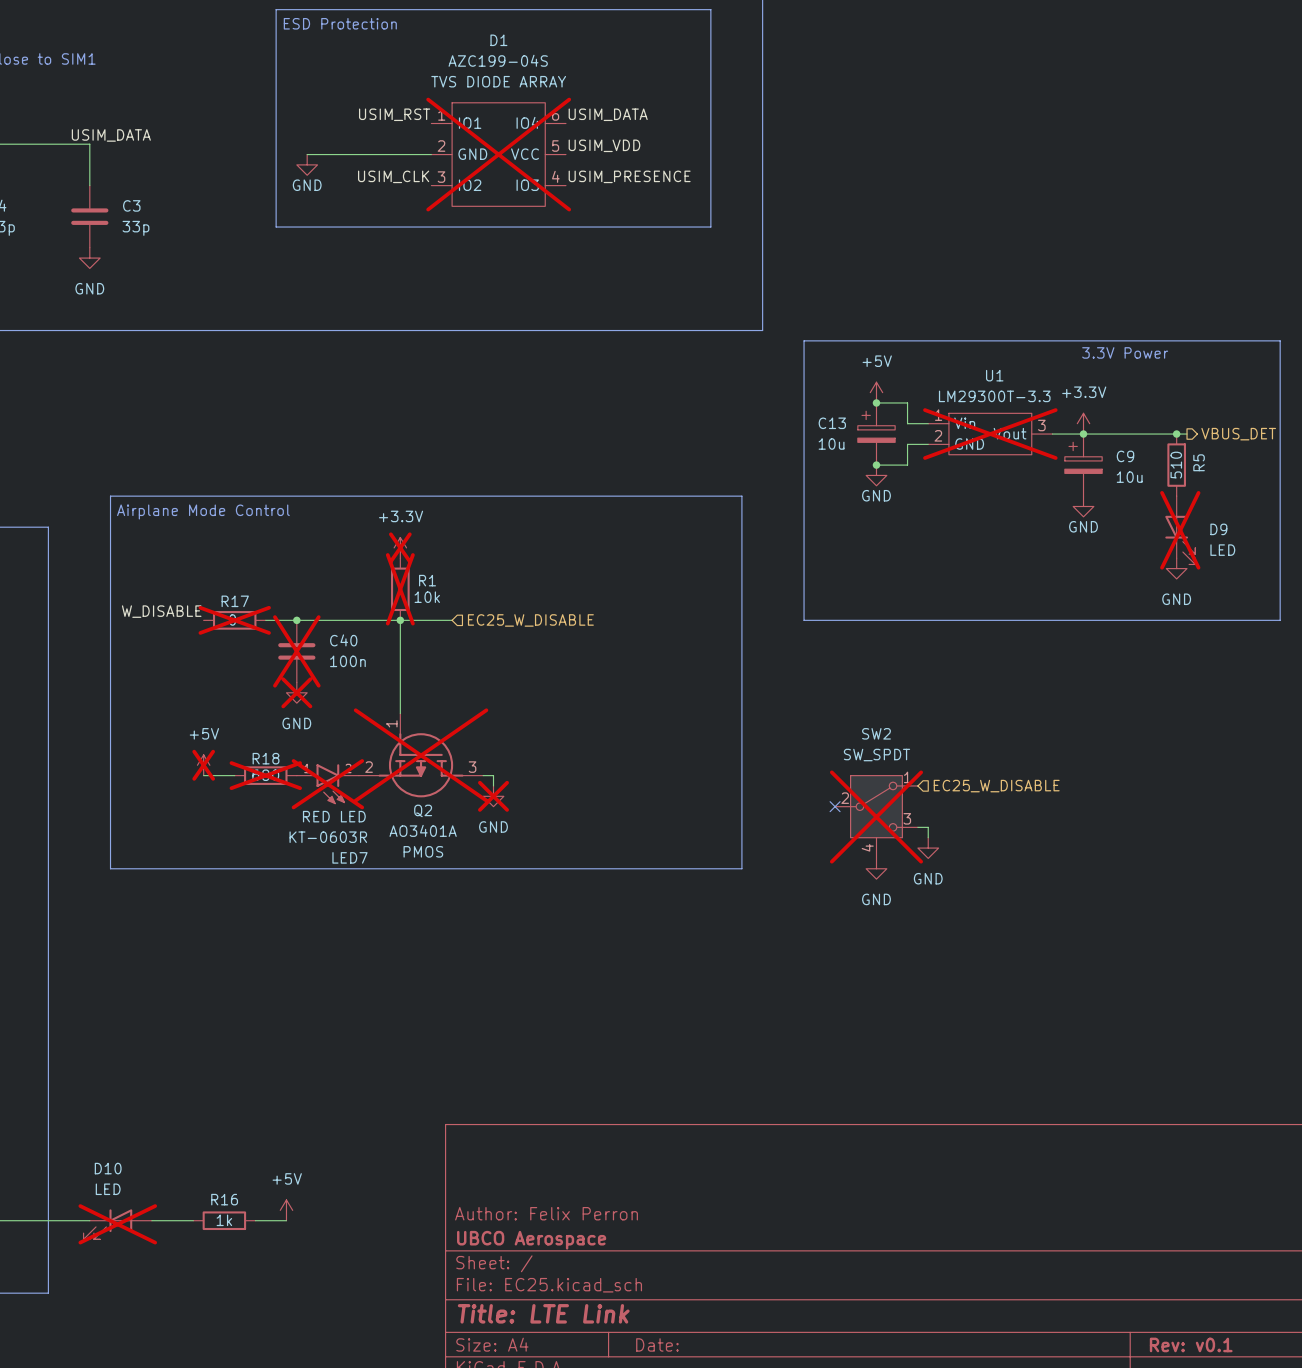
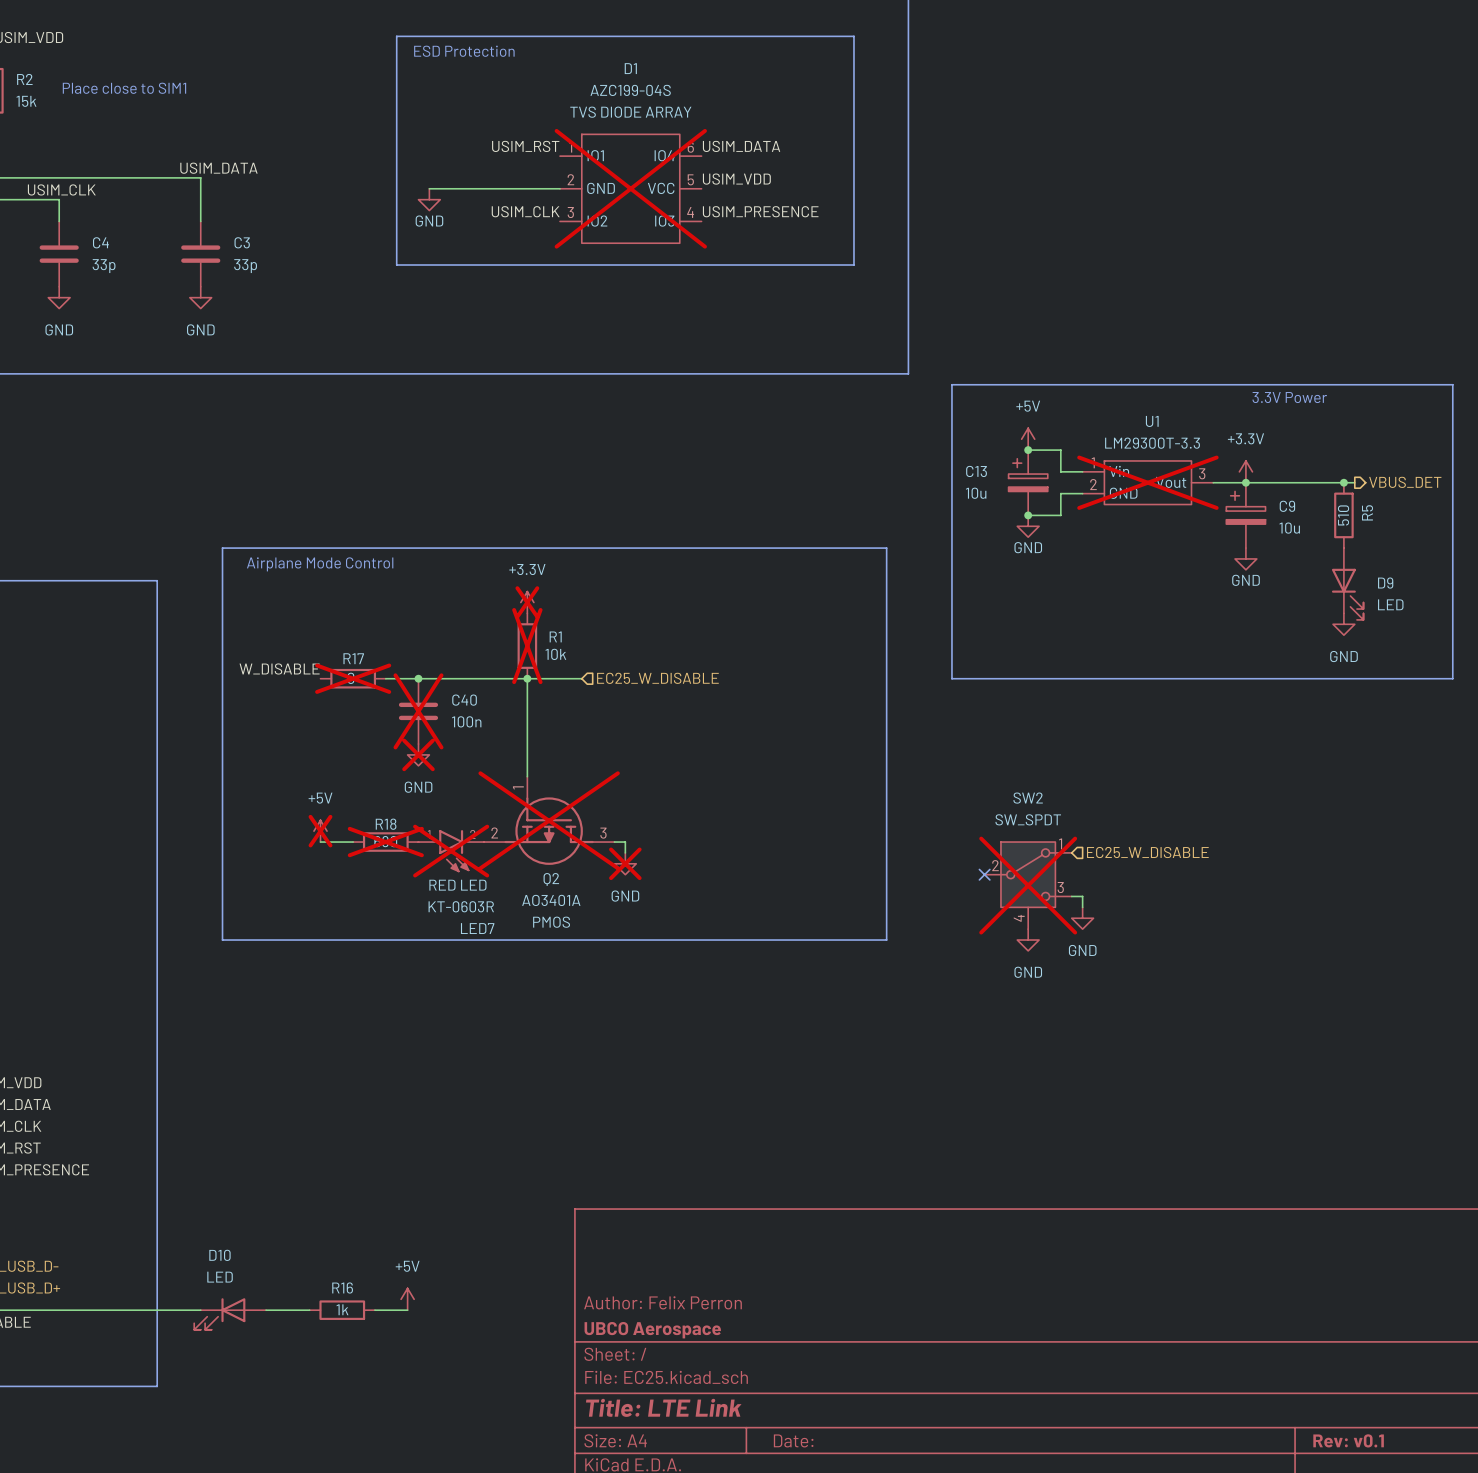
D9 do-not-place cross: (1180, 530) -> none
D10 do-not-place cross: (117, 1224) -> none

